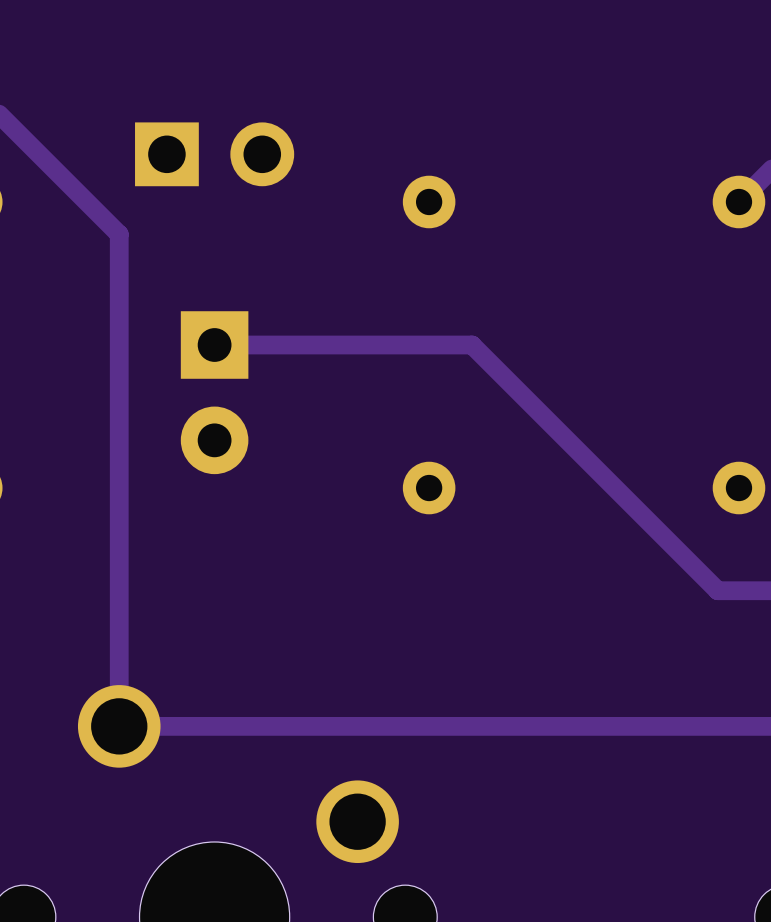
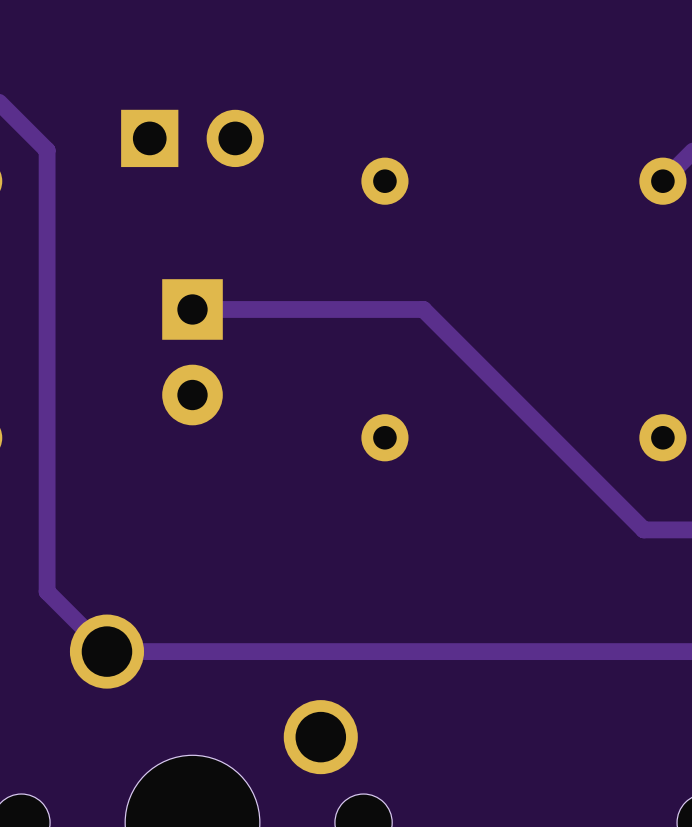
track: (52, 167) (119, 234) (119, 726) -> (47, 150) (47, 591) (106, 651)

